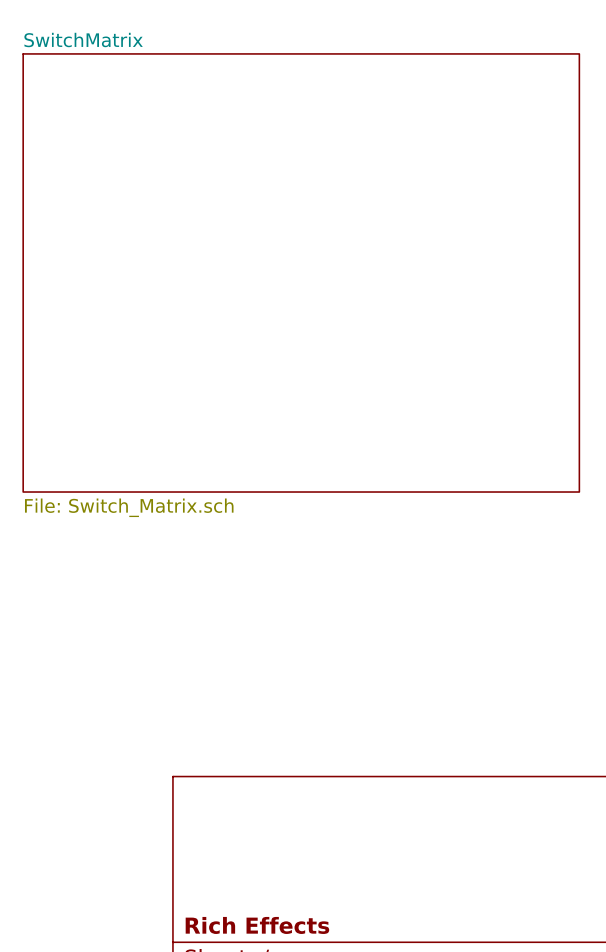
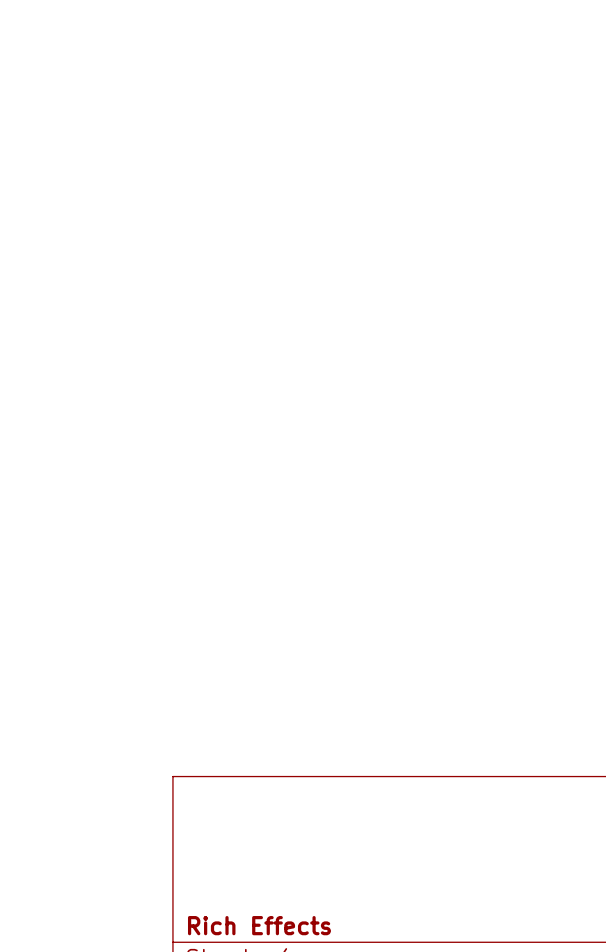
sheet SwitchMatrix: File: Switch_Matrix.sch (301, 272) -> none

